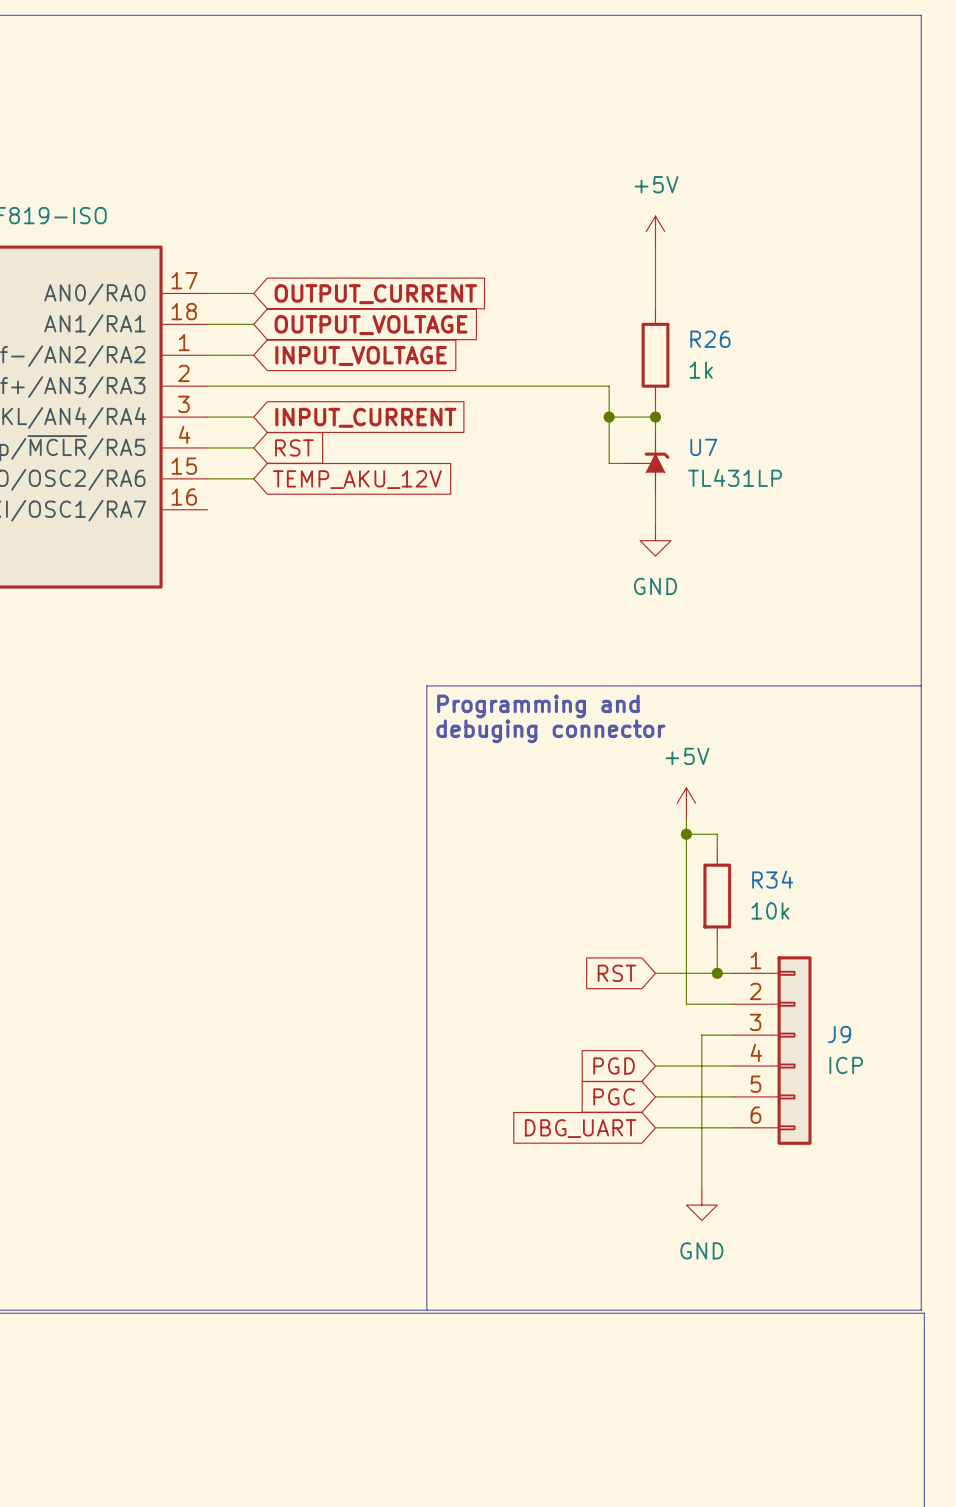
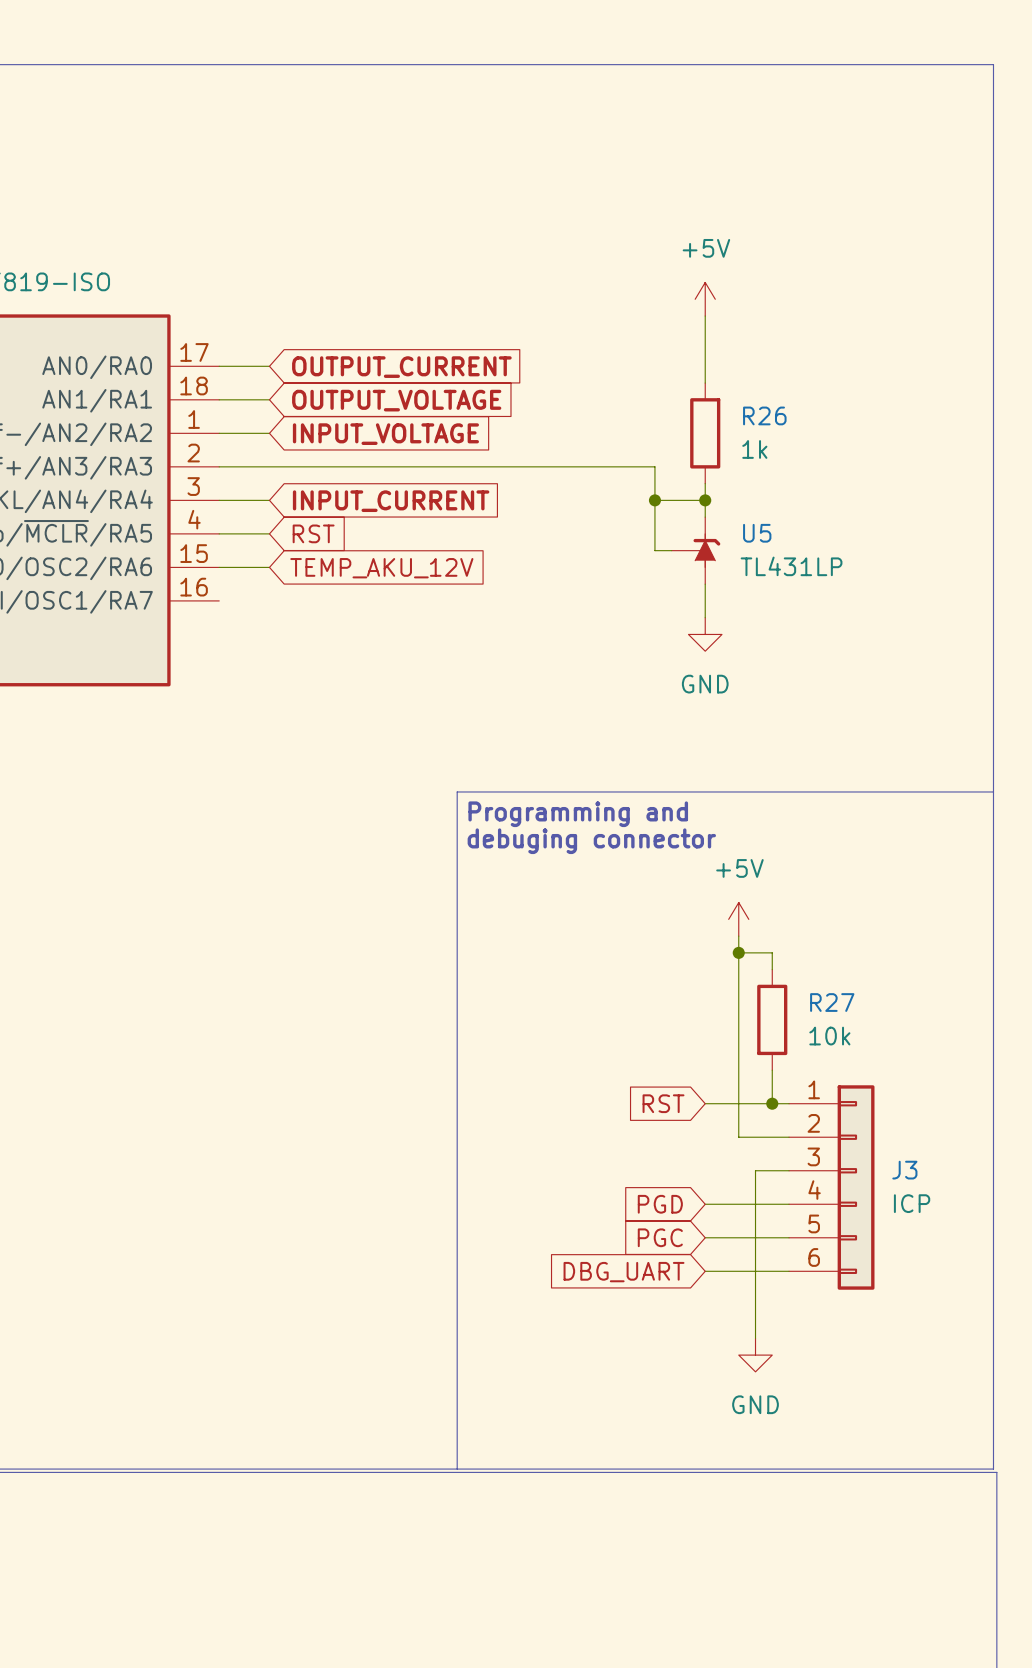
U7 name: U7 (703, 447) -> U5 (757, 533)
R34 name: R34 (772, 879) -> R27 (832, 1002)
J9 name: J9 (839, 1034) -> J3 (904, 1170)

